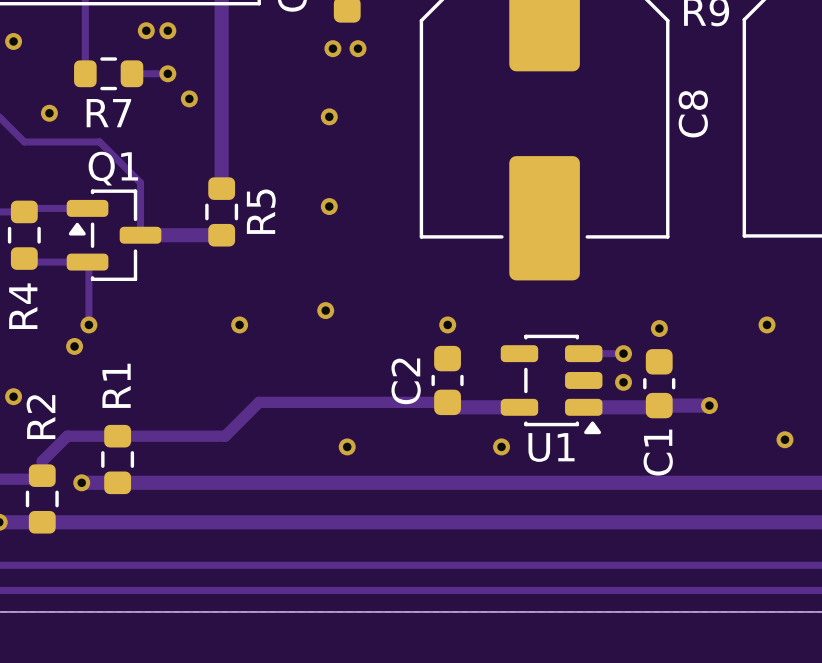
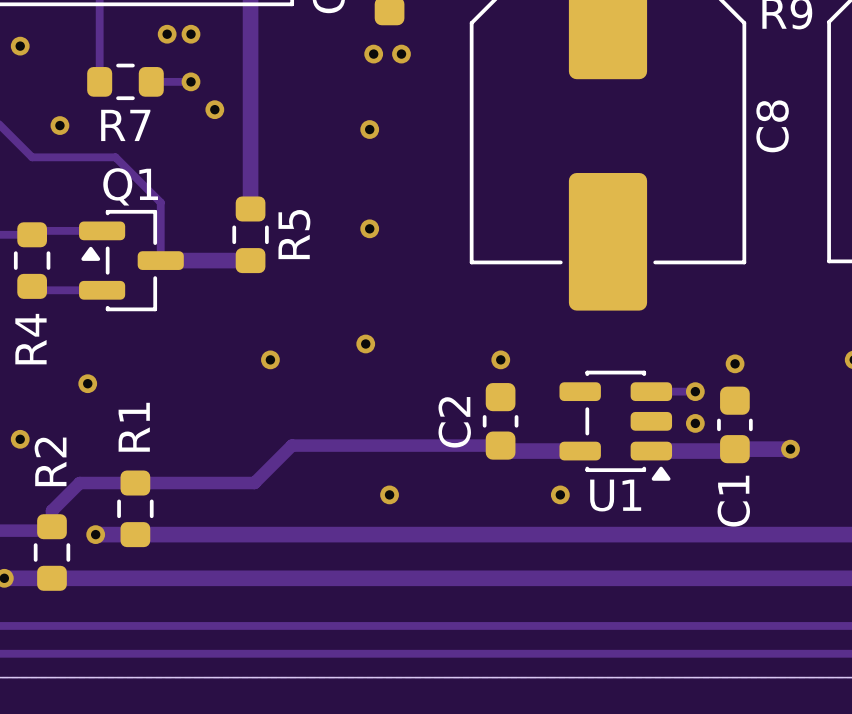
track: (87, 262) (88, 324) -> none
via: (88, 324) -> none

